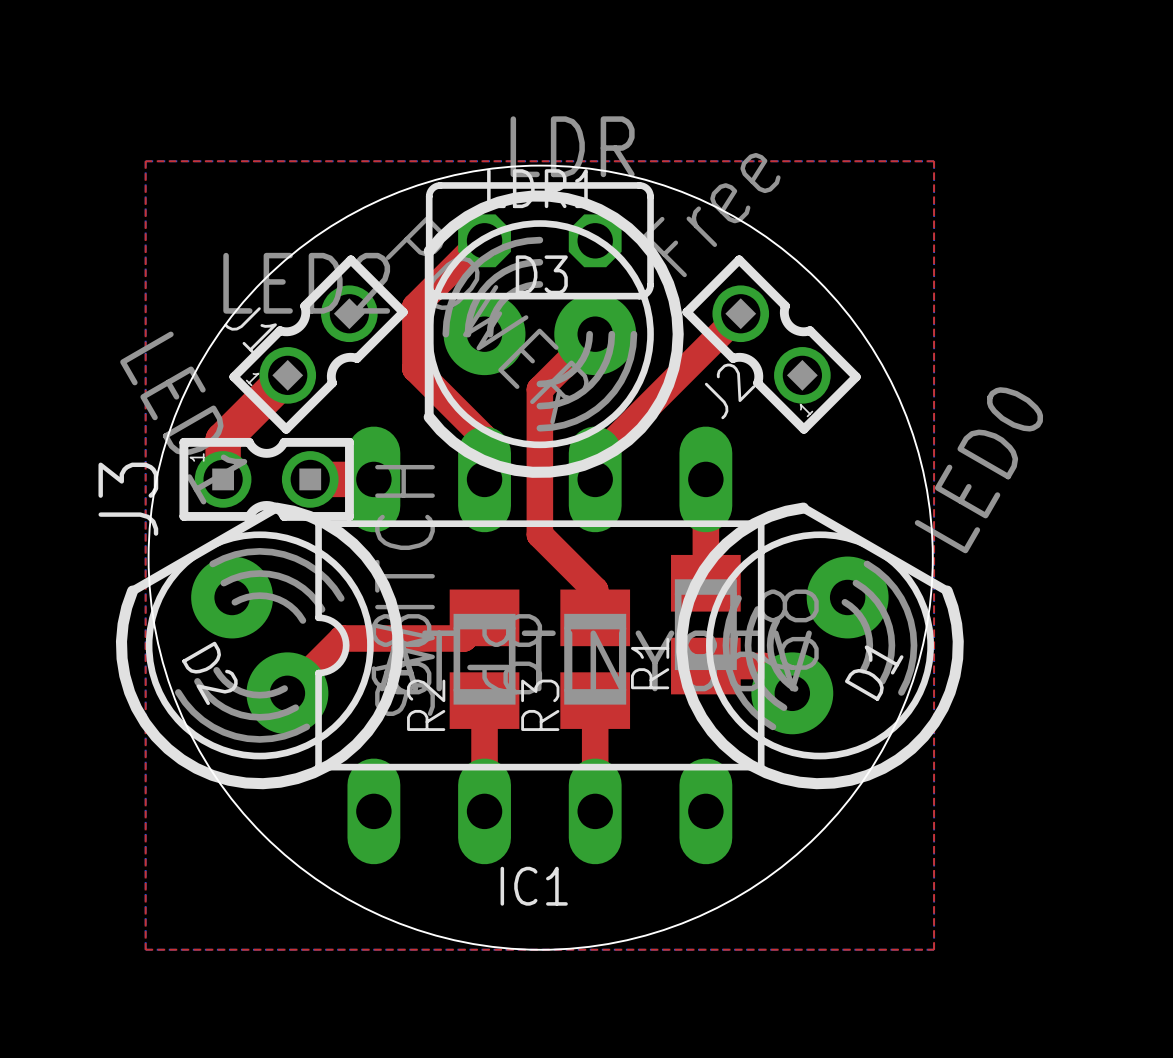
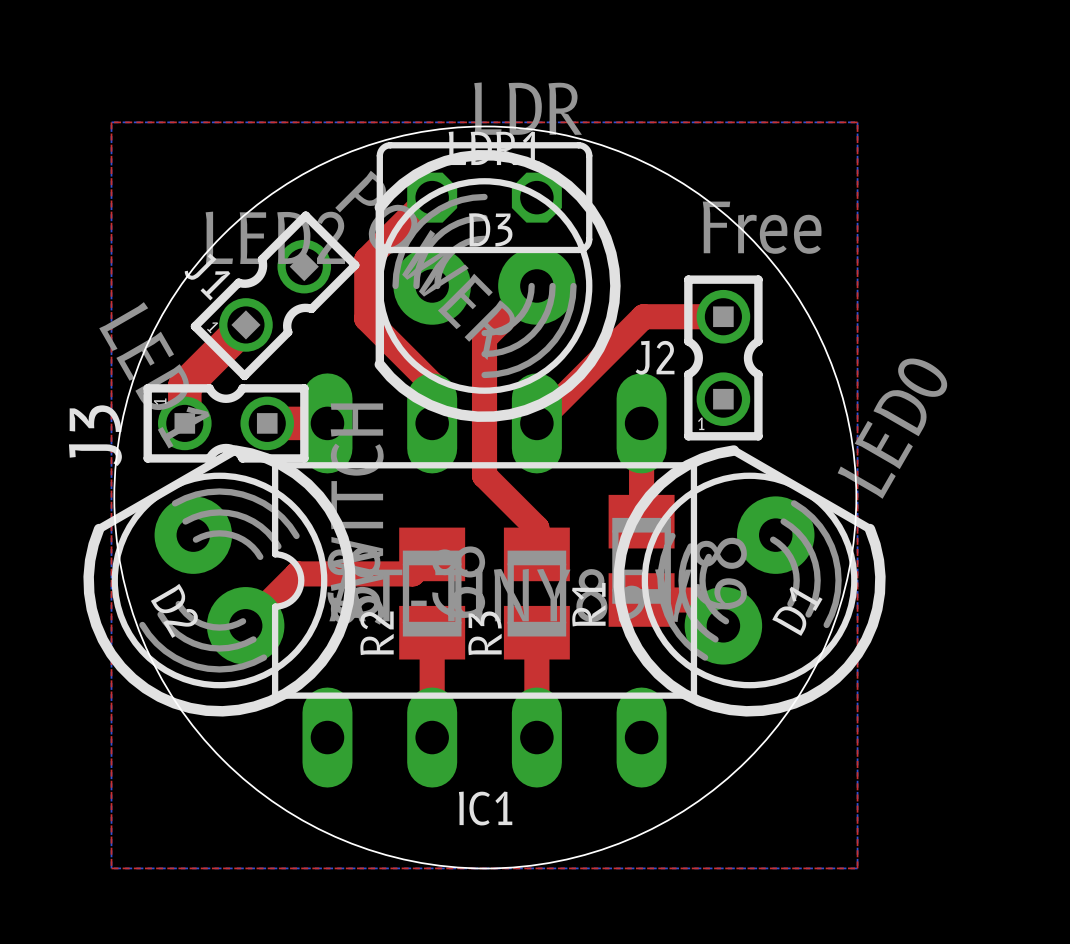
top track: (740, 313) (595, 459) (595, 479) -> (723, 316) (643, 316) (536, 423)
J2 rotation: 0° (771, 344) -> 45° clockwise (723, 357)

